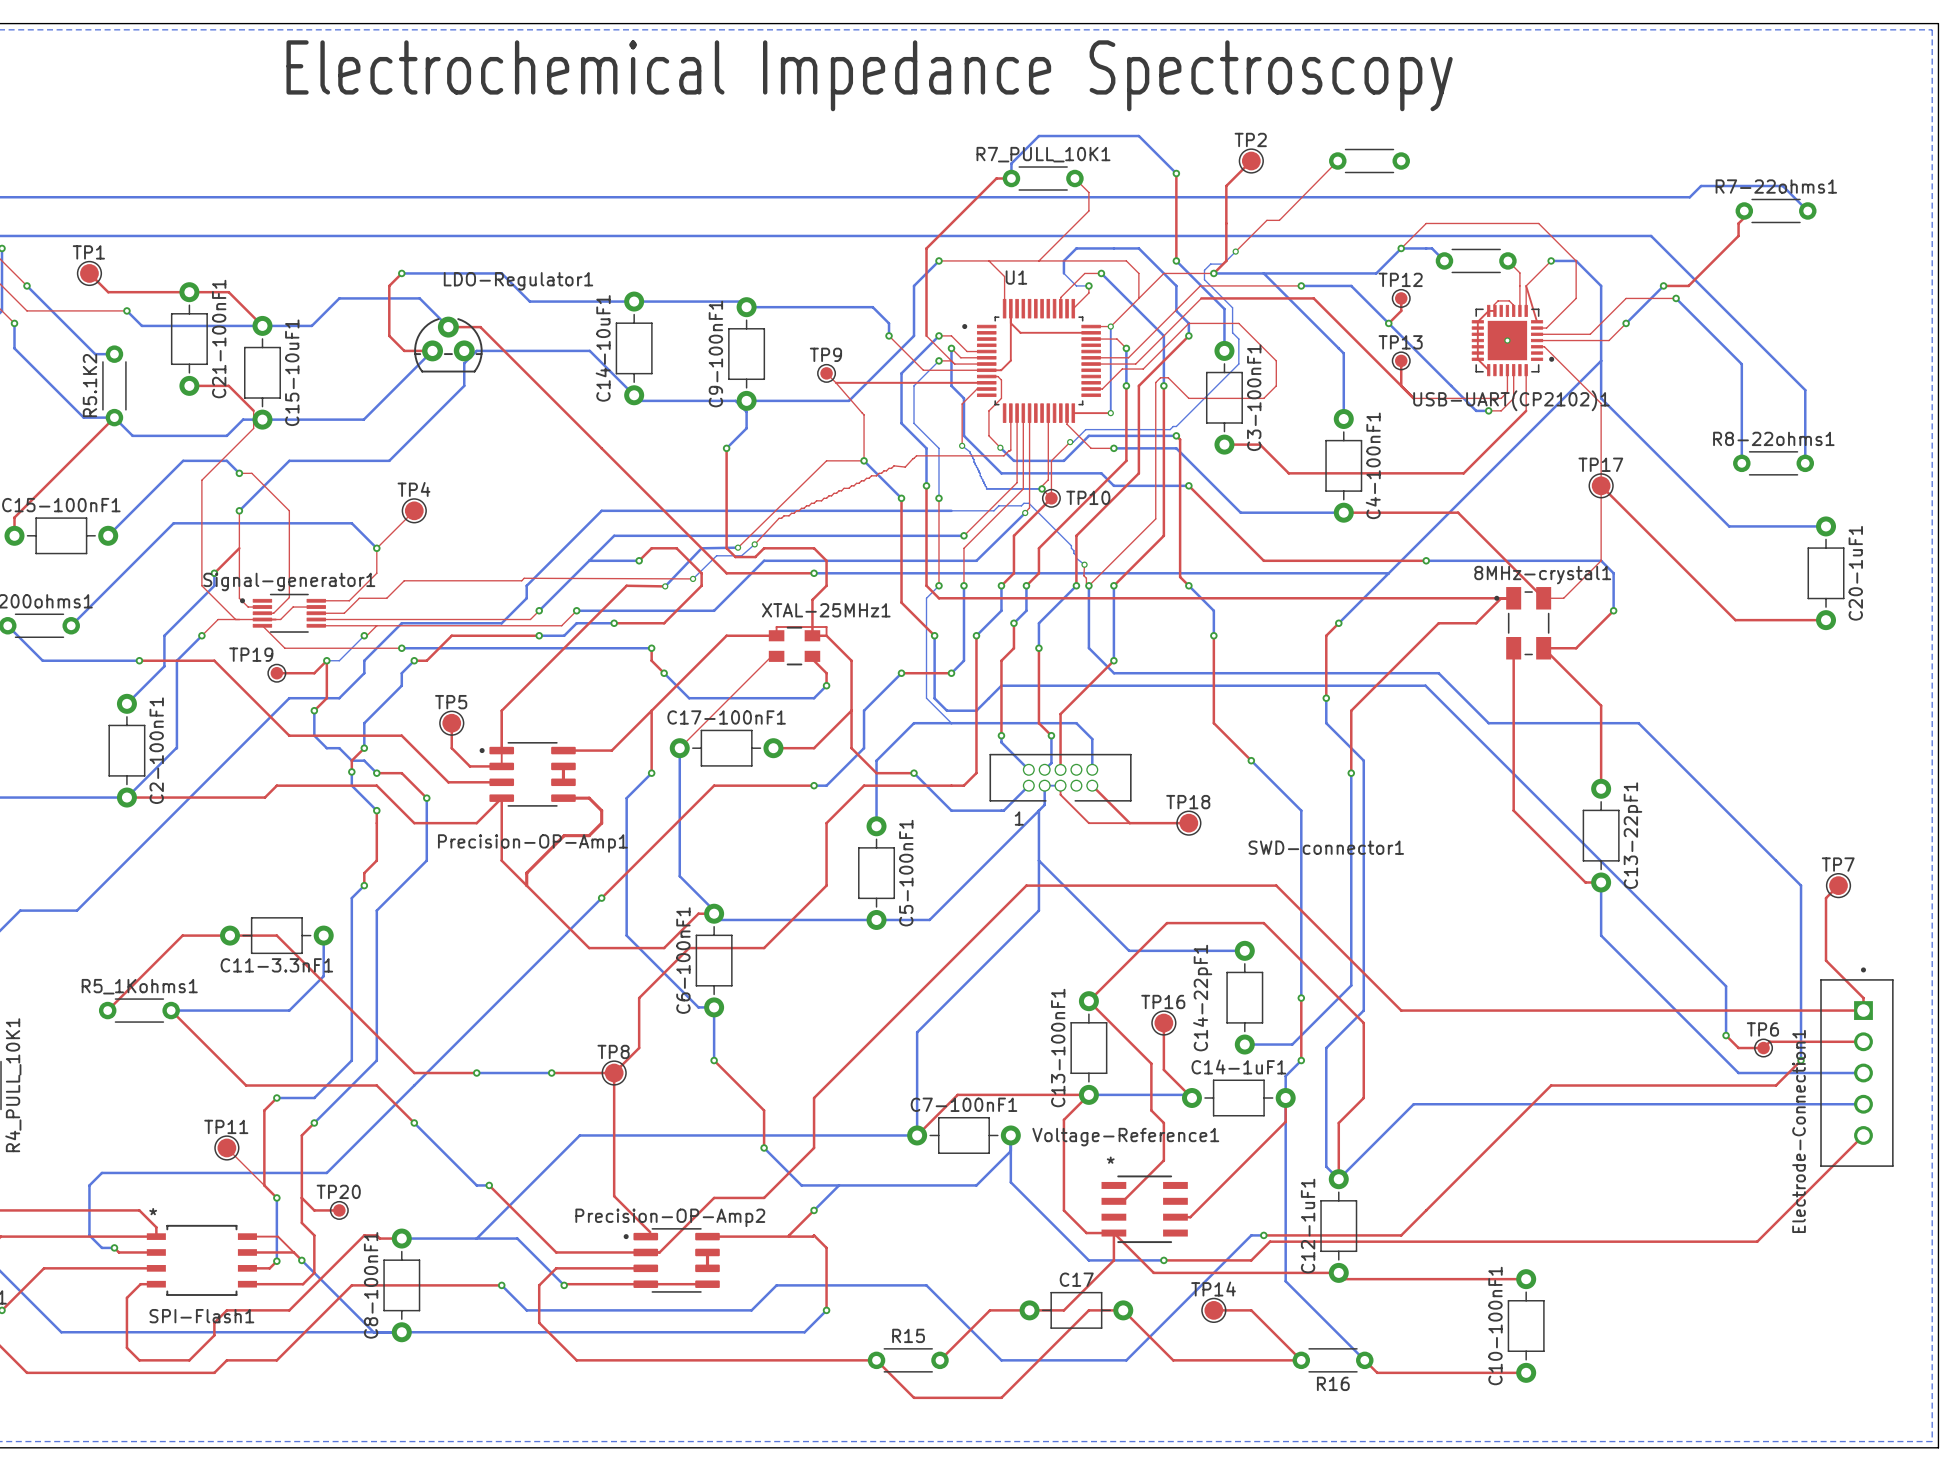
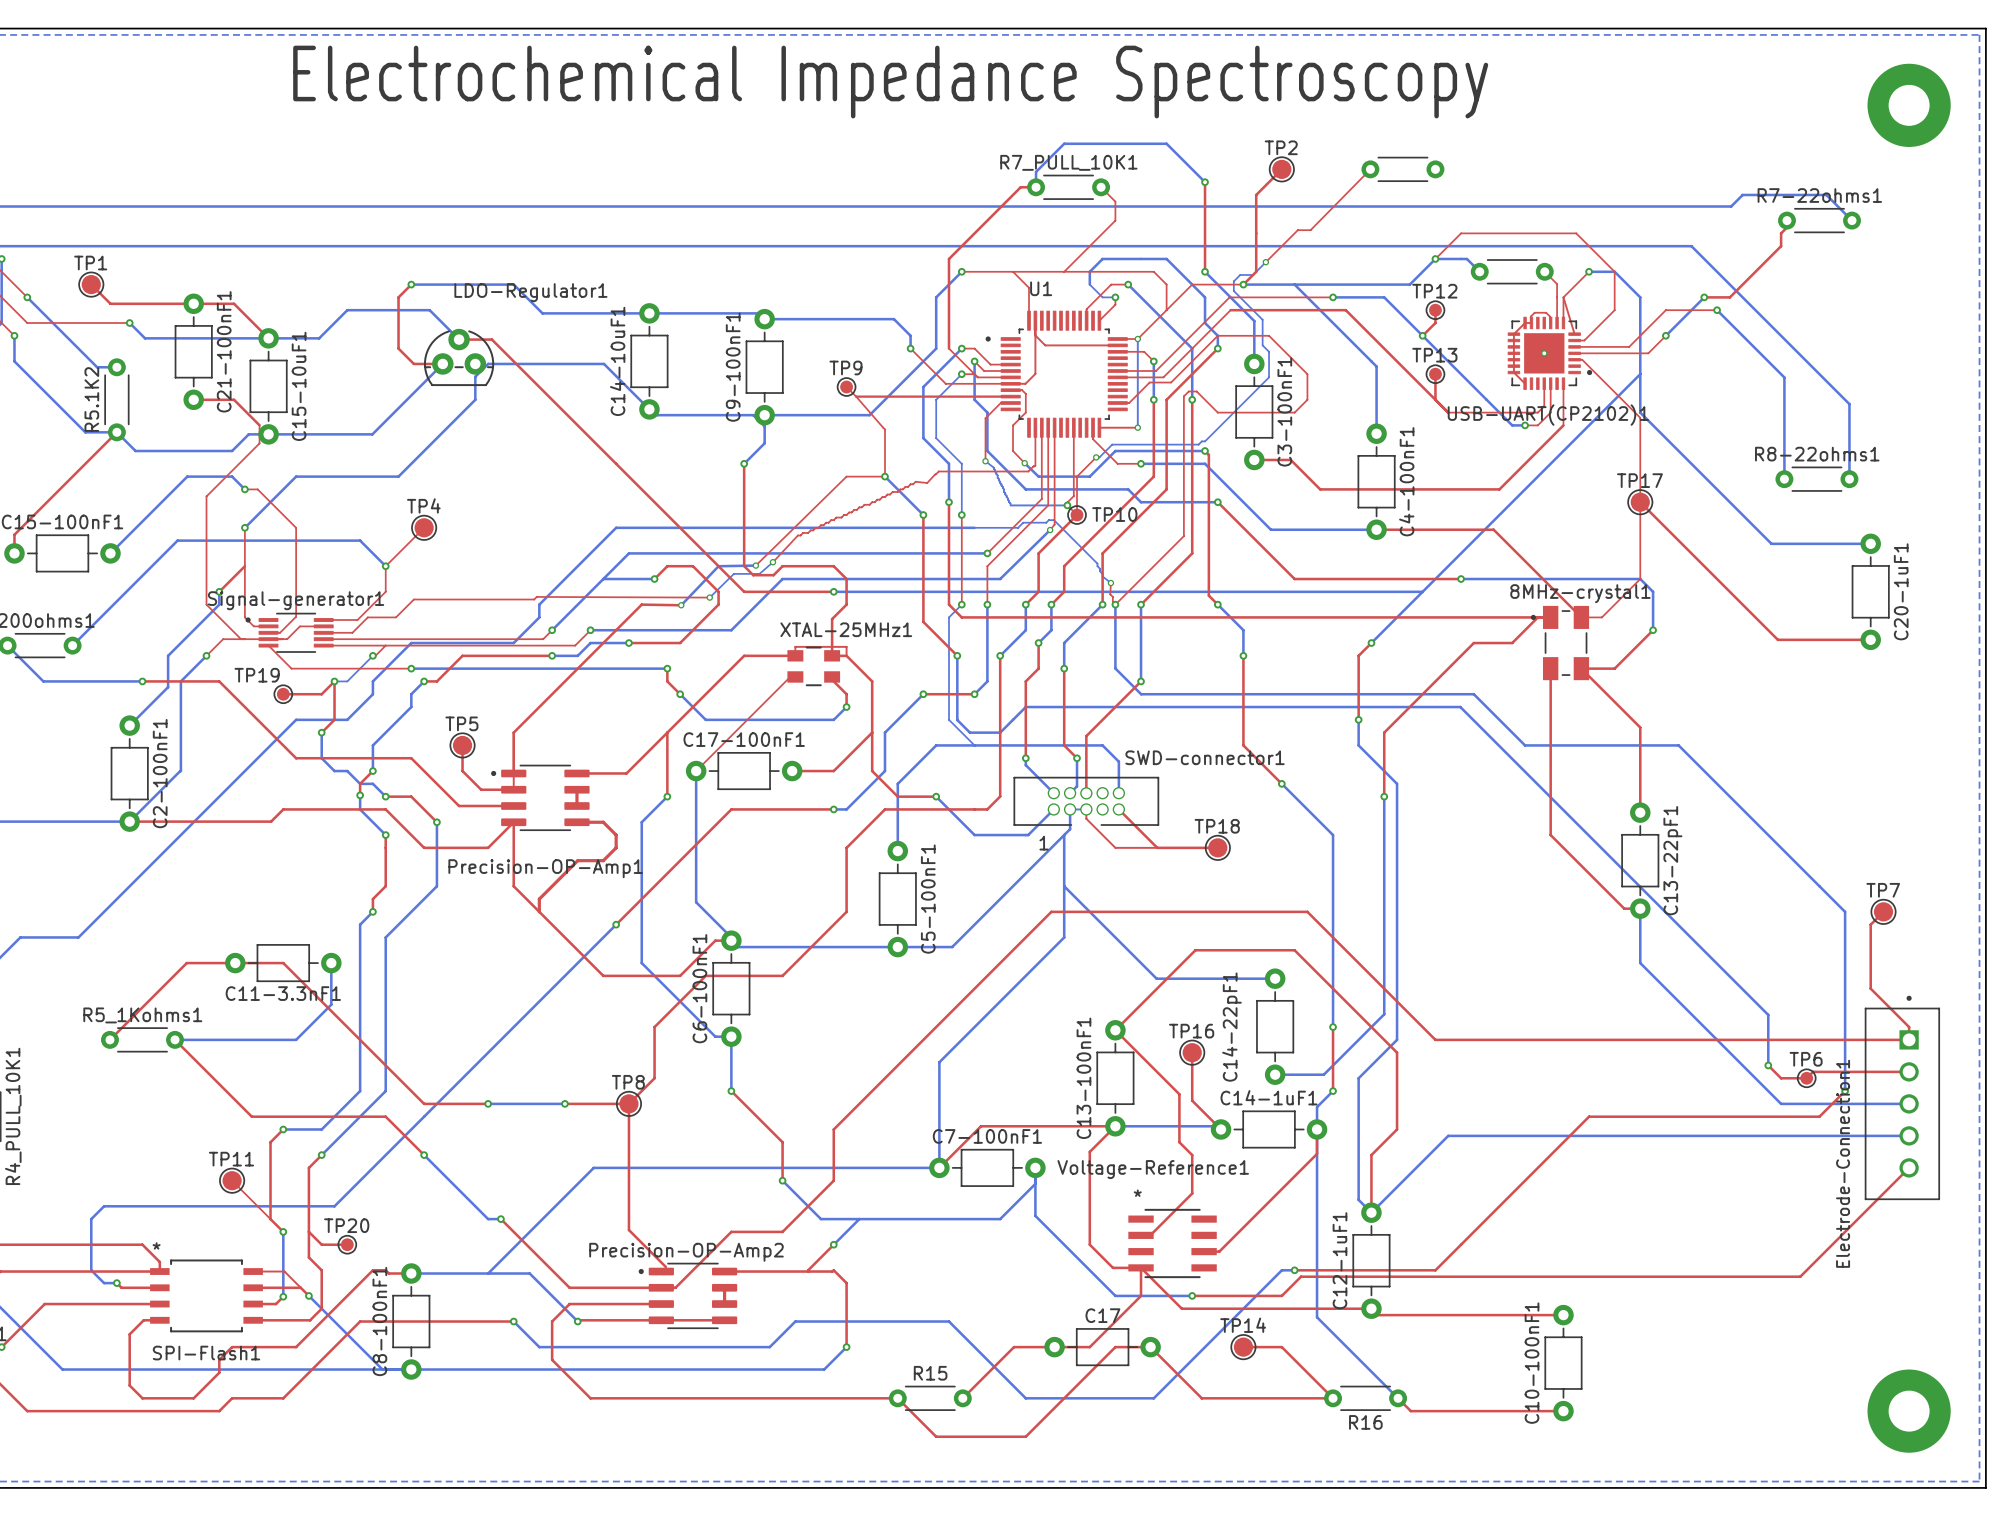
part: none -> (1909, 105)
SWD-connector1 name position: SWD-connector1 (1326, 847) -> SWD-connector1 (1205, 757)
part: none -> (1909, 1411)

